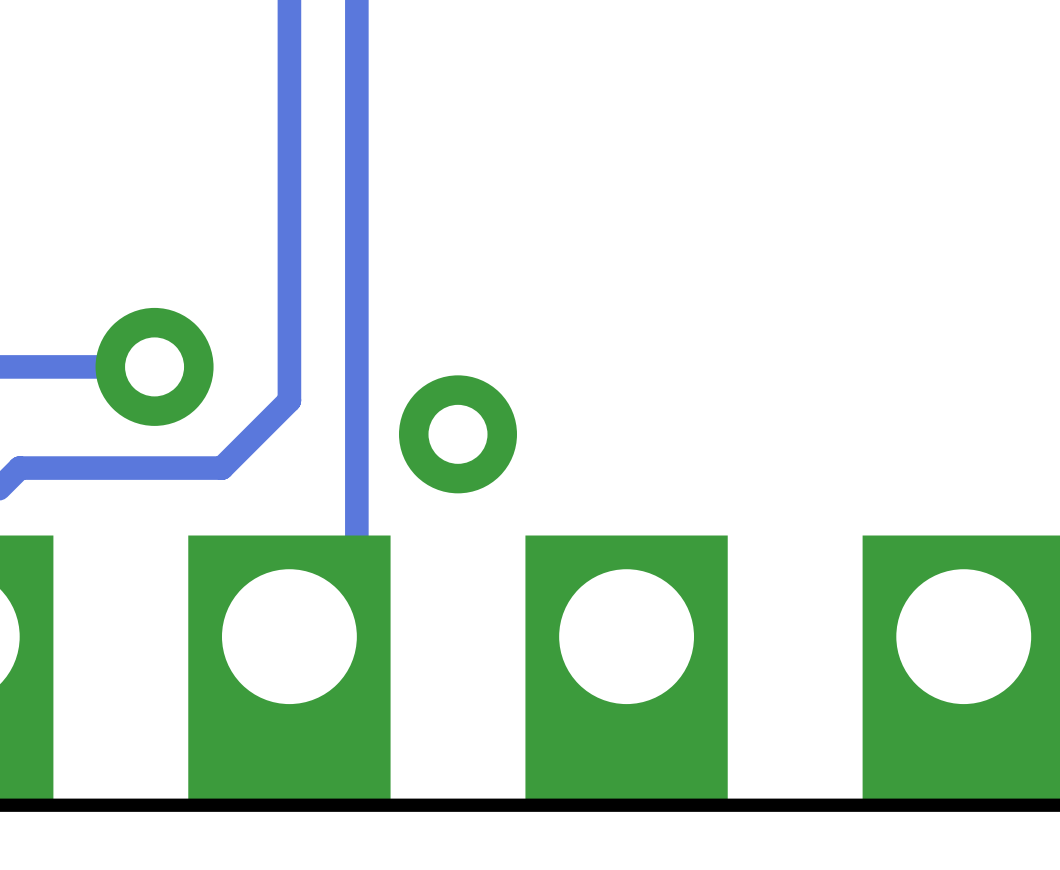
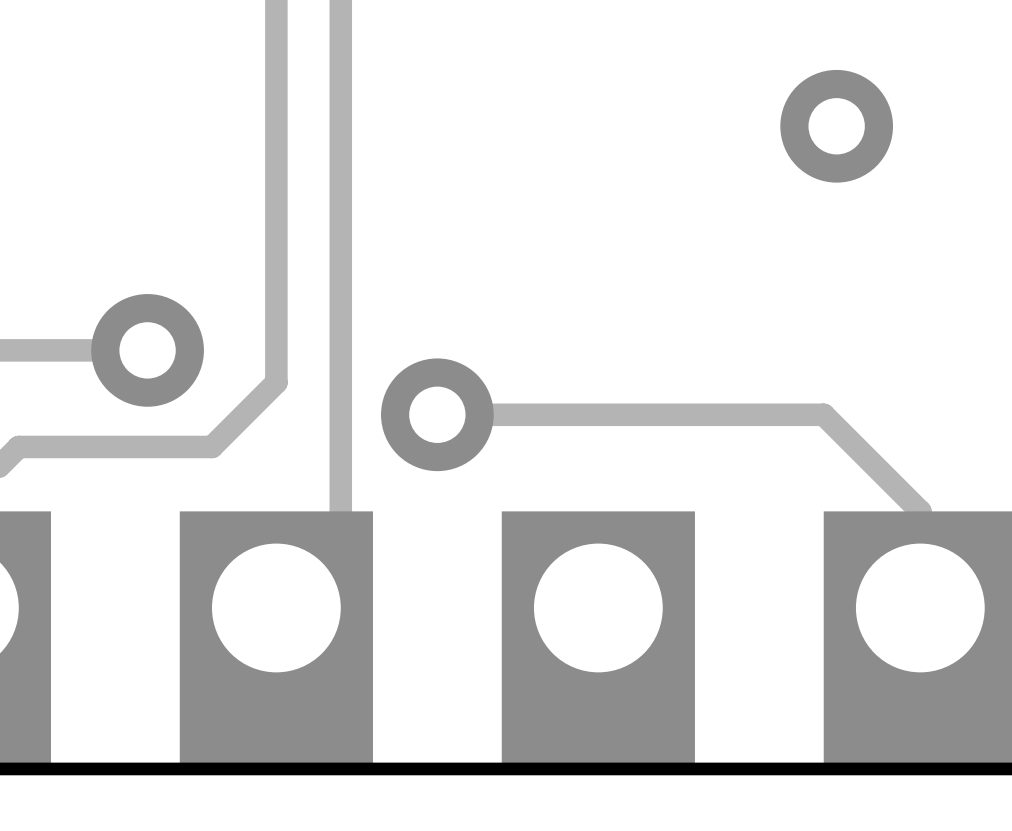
via: none -> (836, 126)
track: none -> (437, 414) (823, 414) (920, 511) (920, 607)

